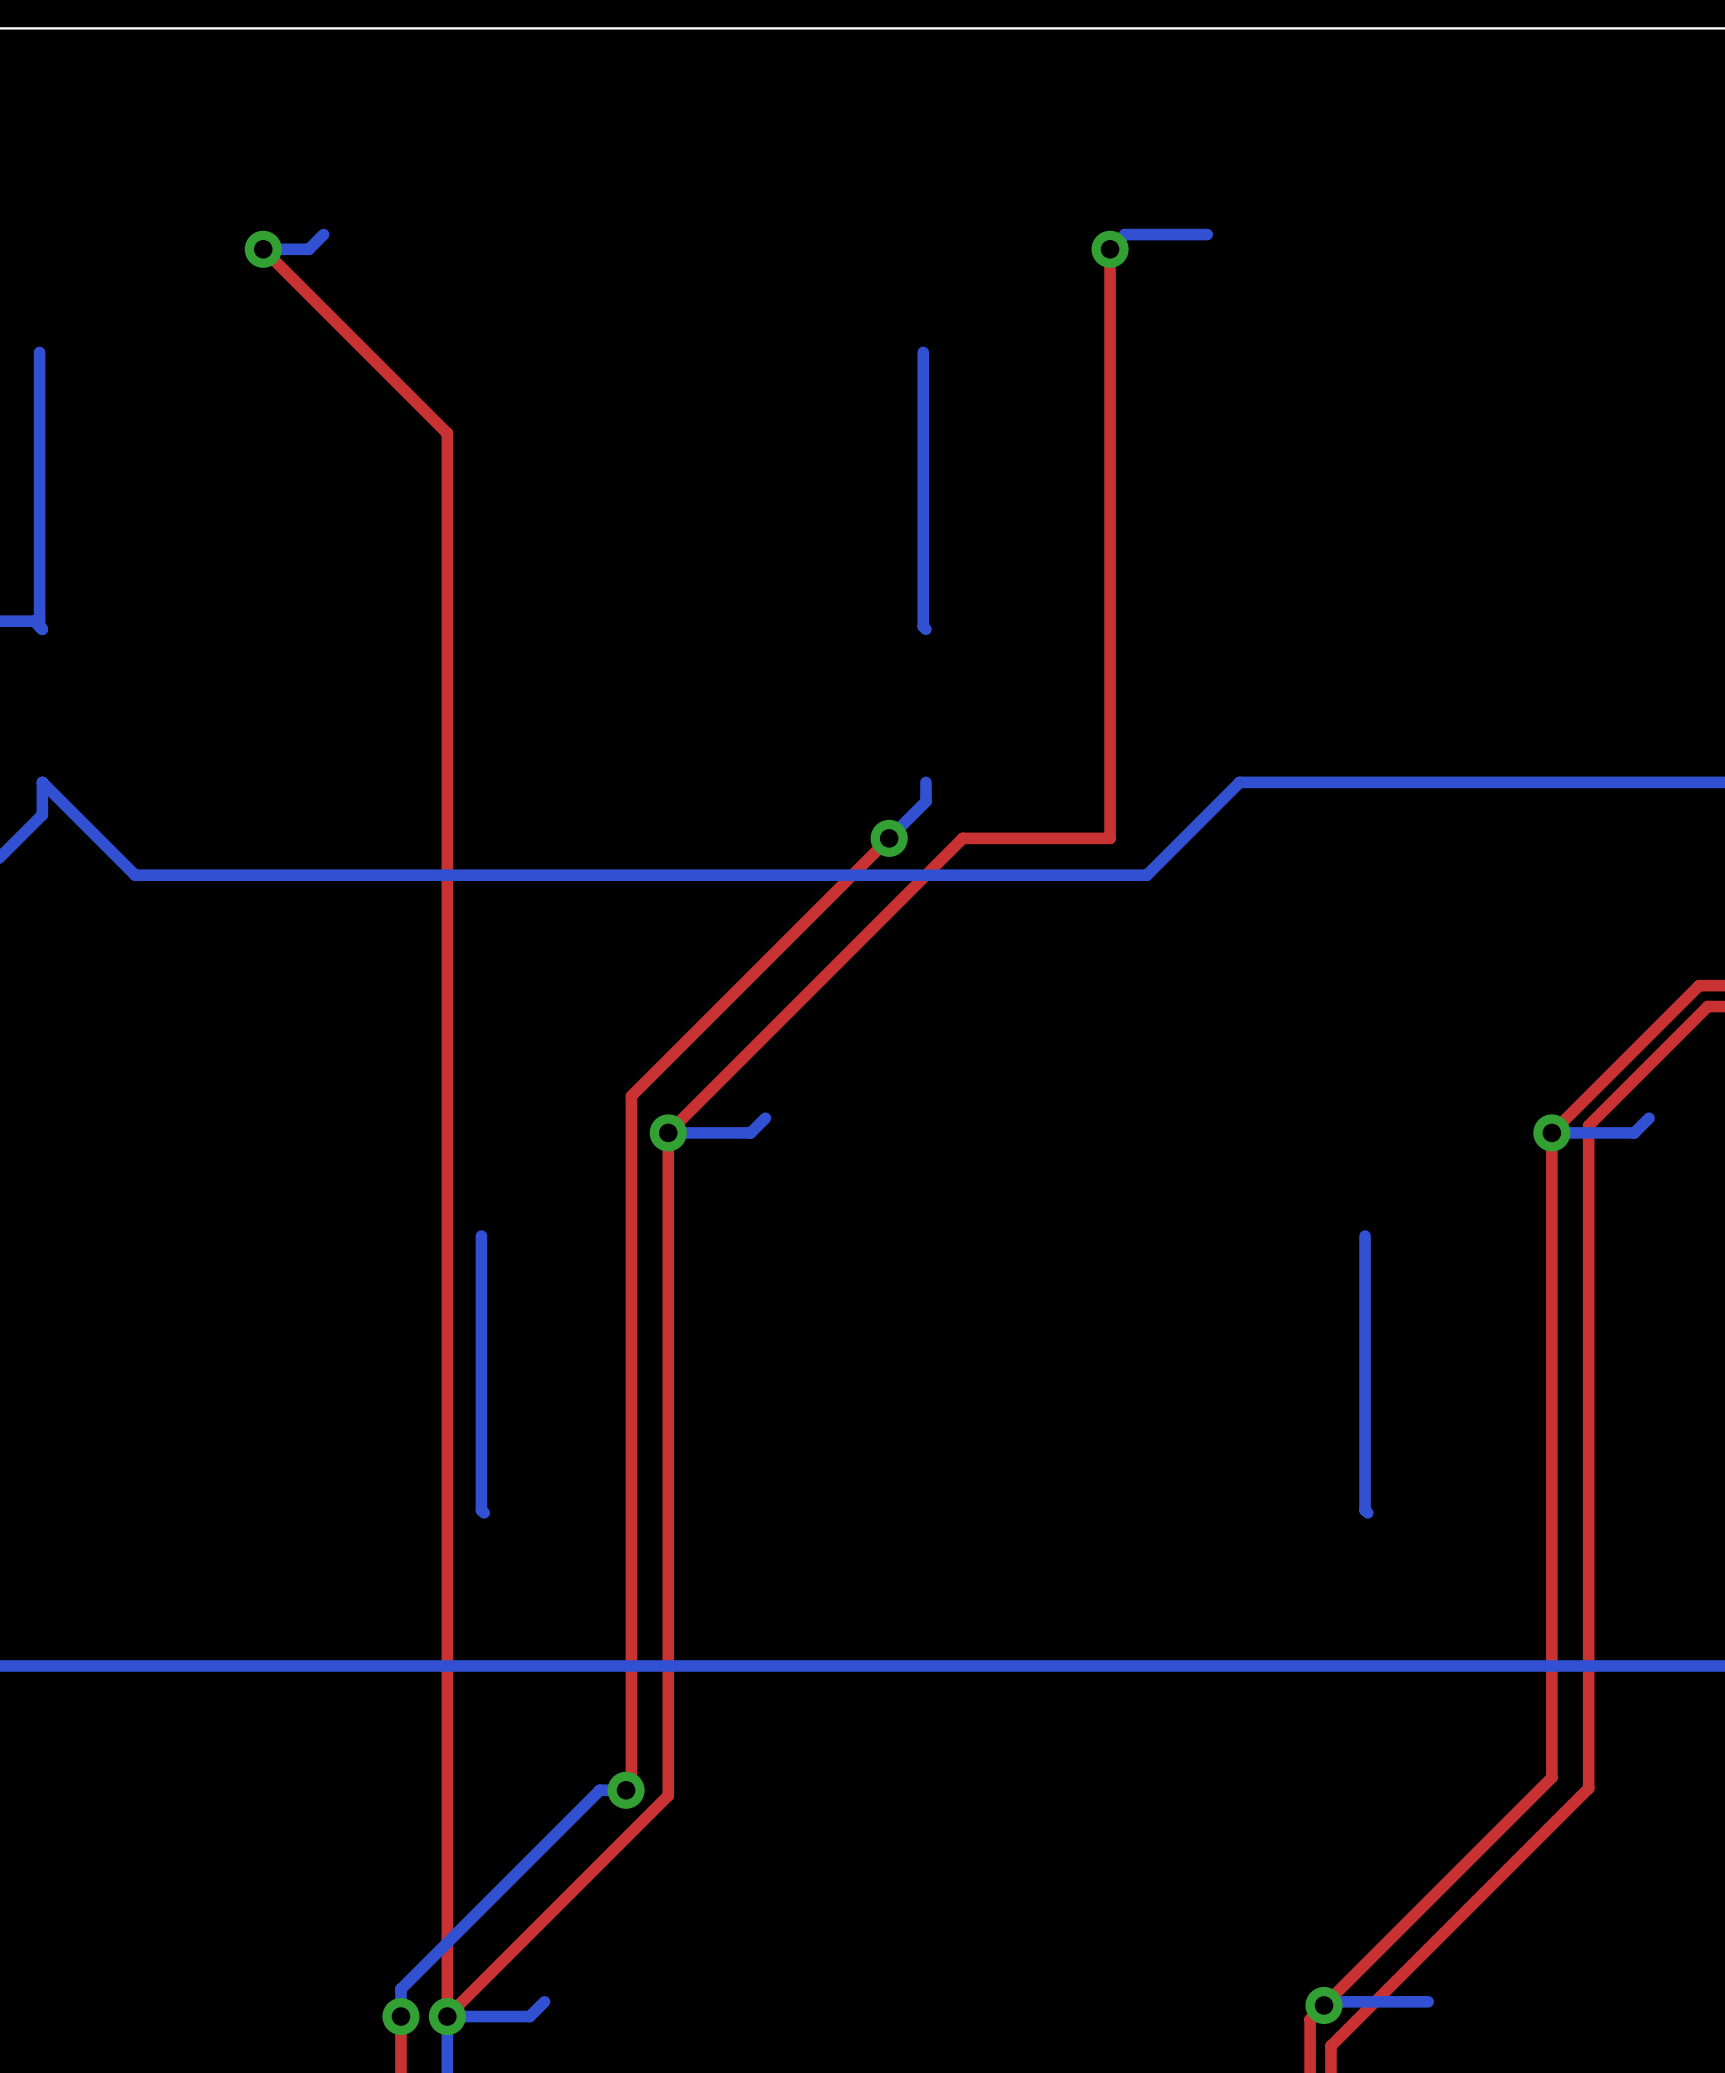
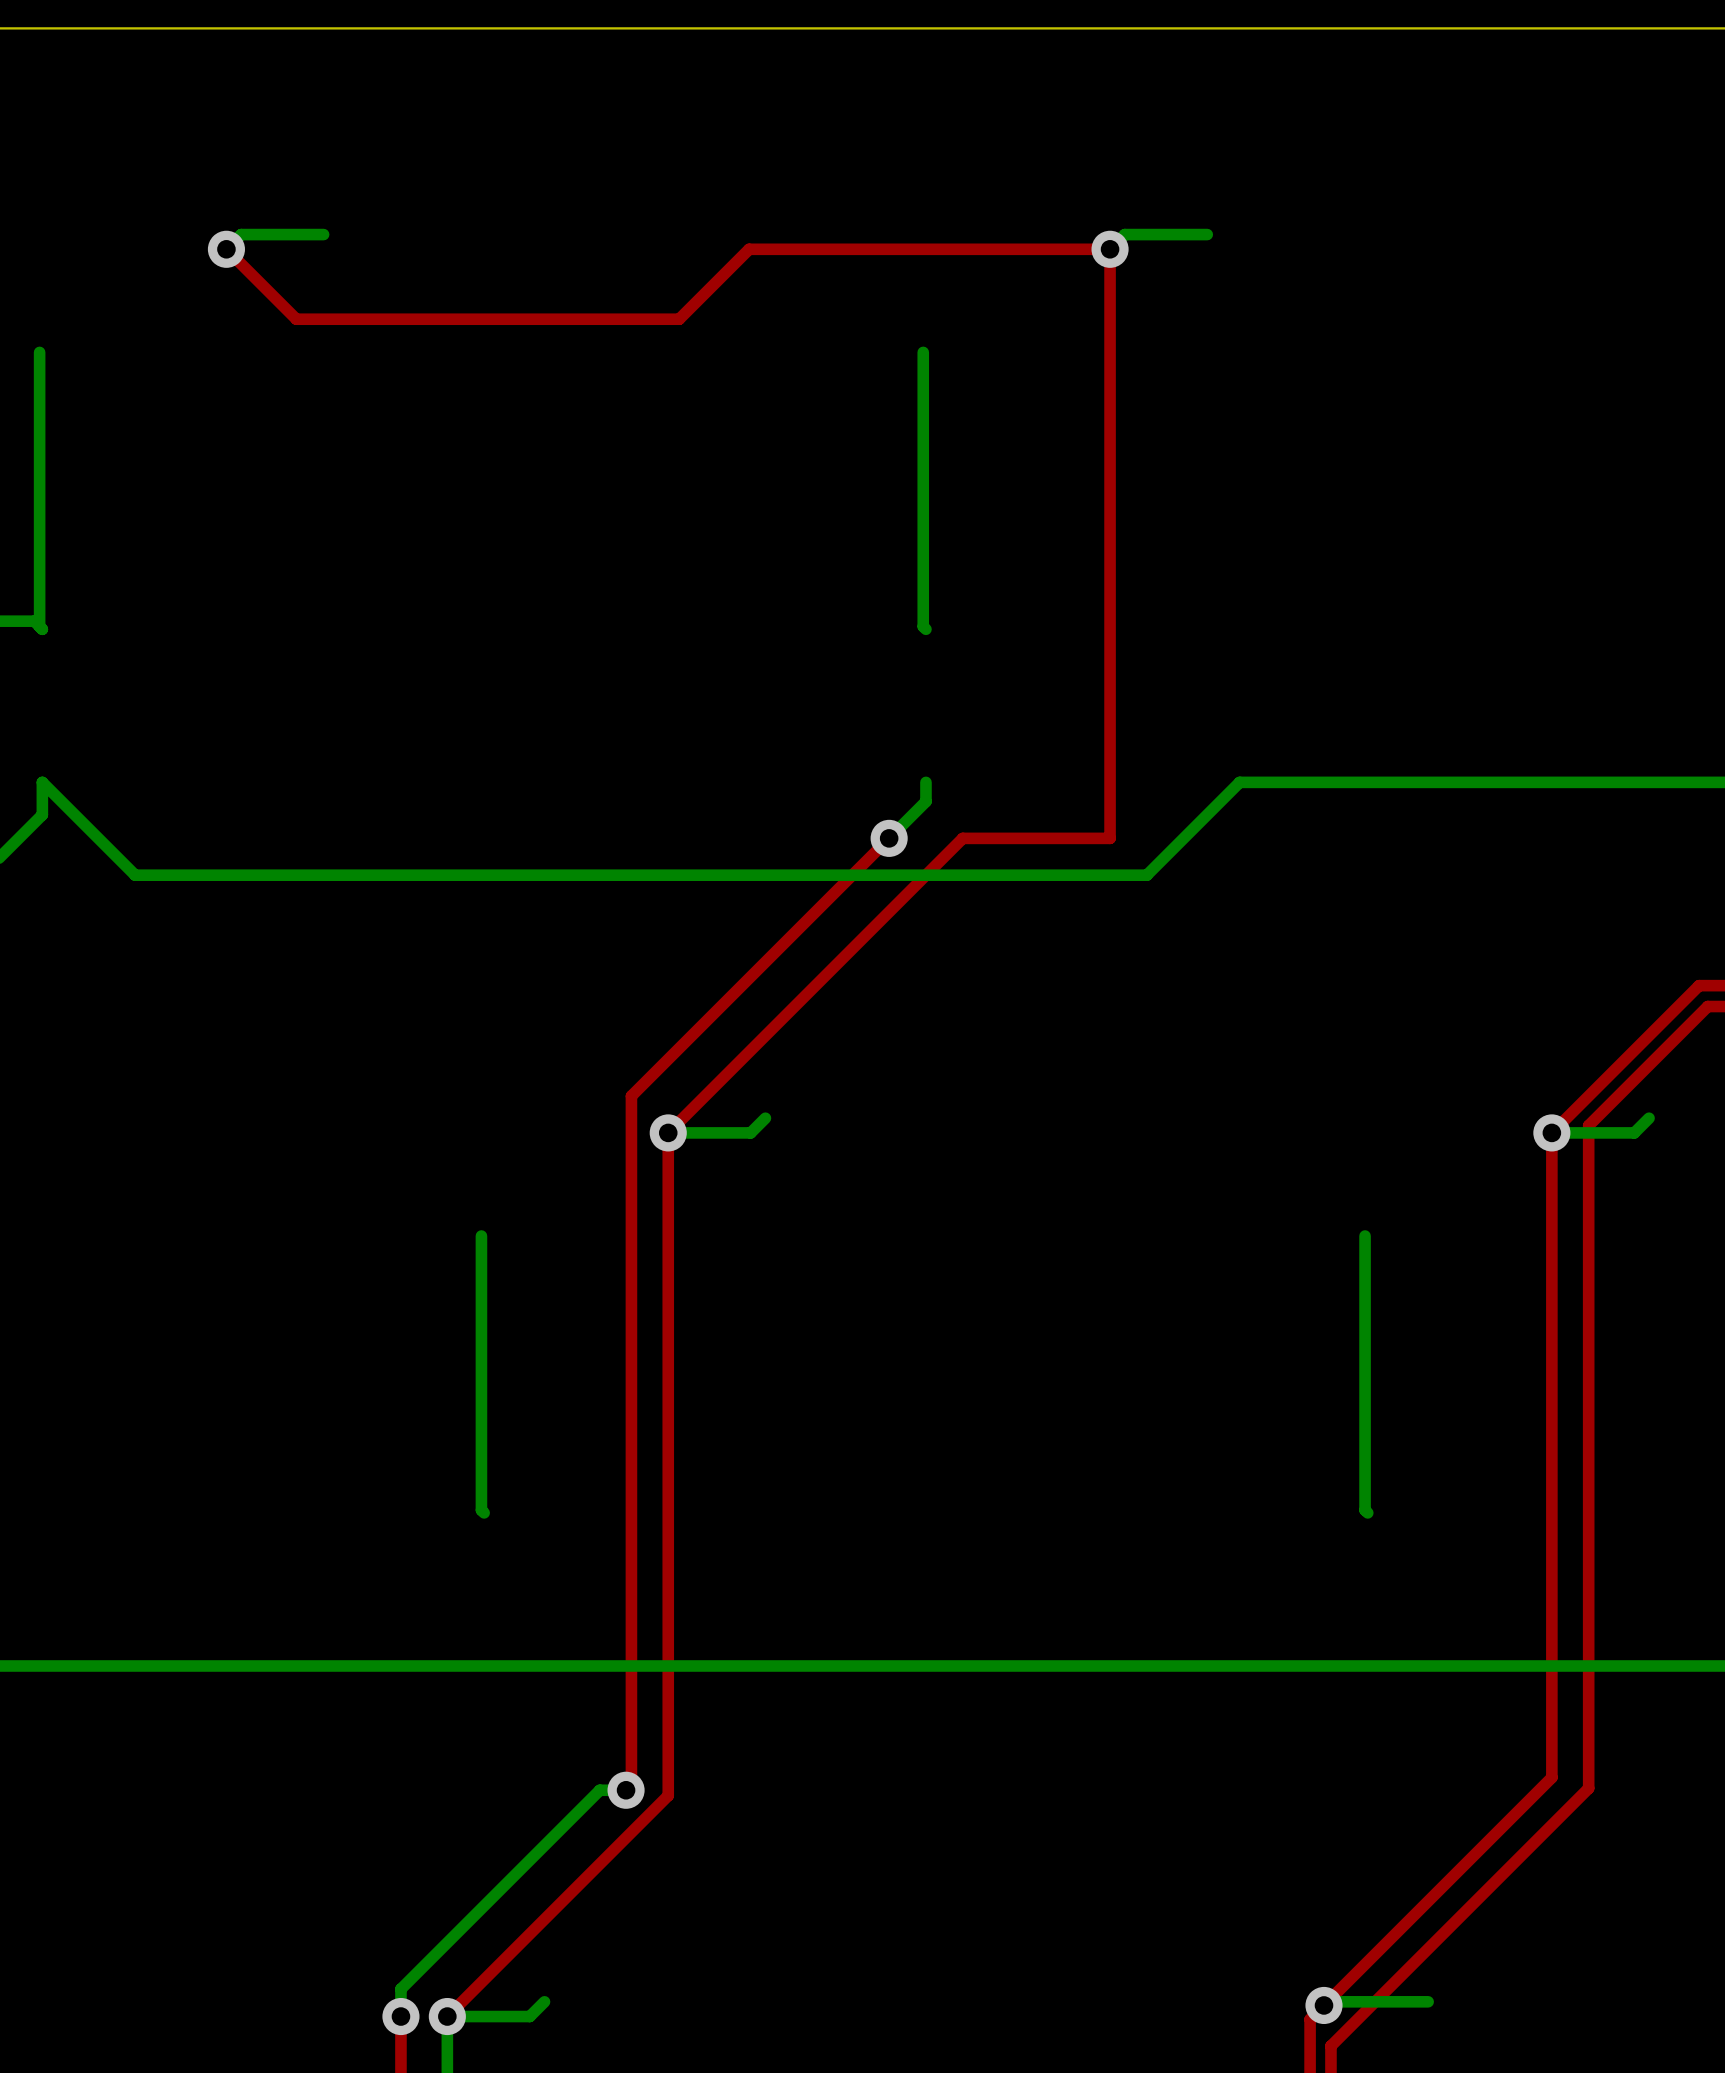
bottom track: (323, 234) (308, 249) (263, 249) -> (323, 234) (241, 234) (226, 249)
top track: (263, 249) (447, 433) (447, 2016) -> none
via position: (263, 249) -> (226, 249)
top track: none -> (1110, 249) (749, 249) (679, 319) (296, 319) (226, 249)

